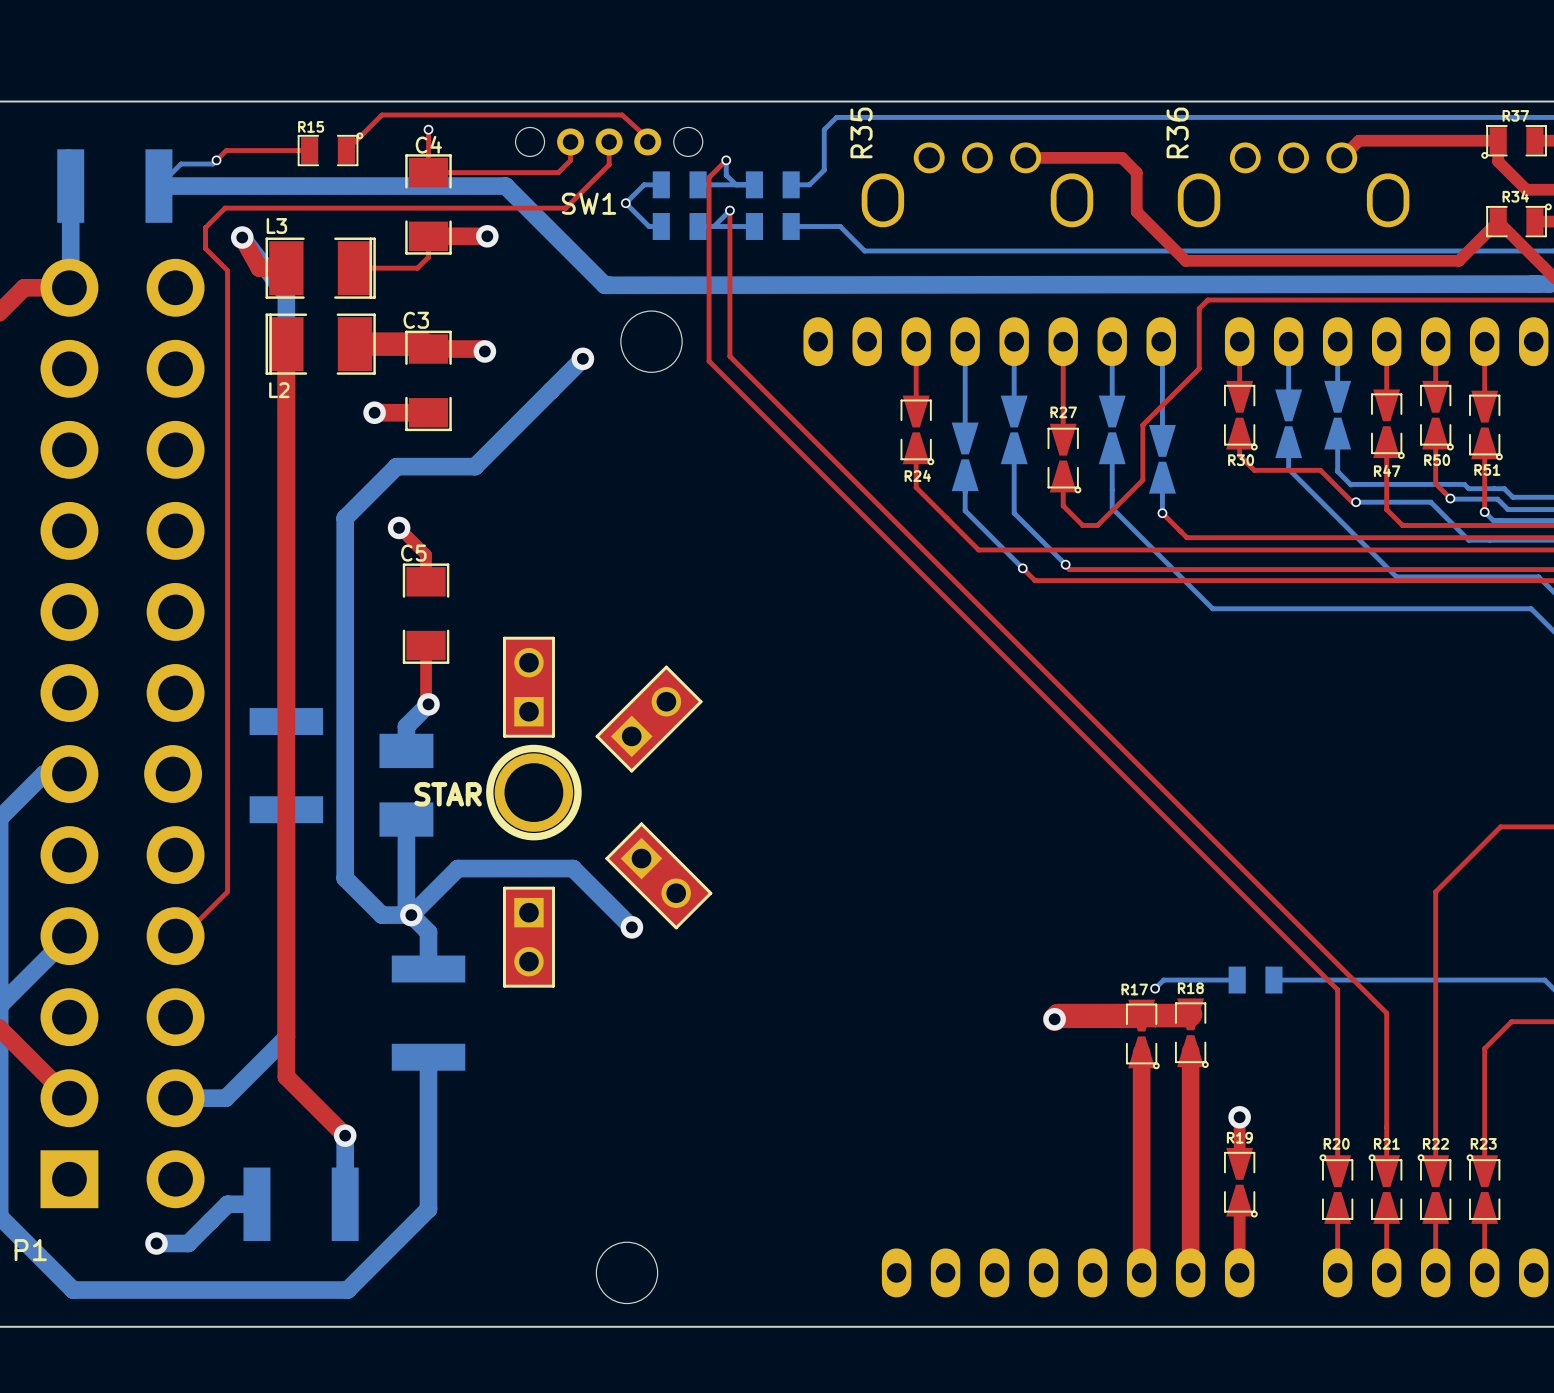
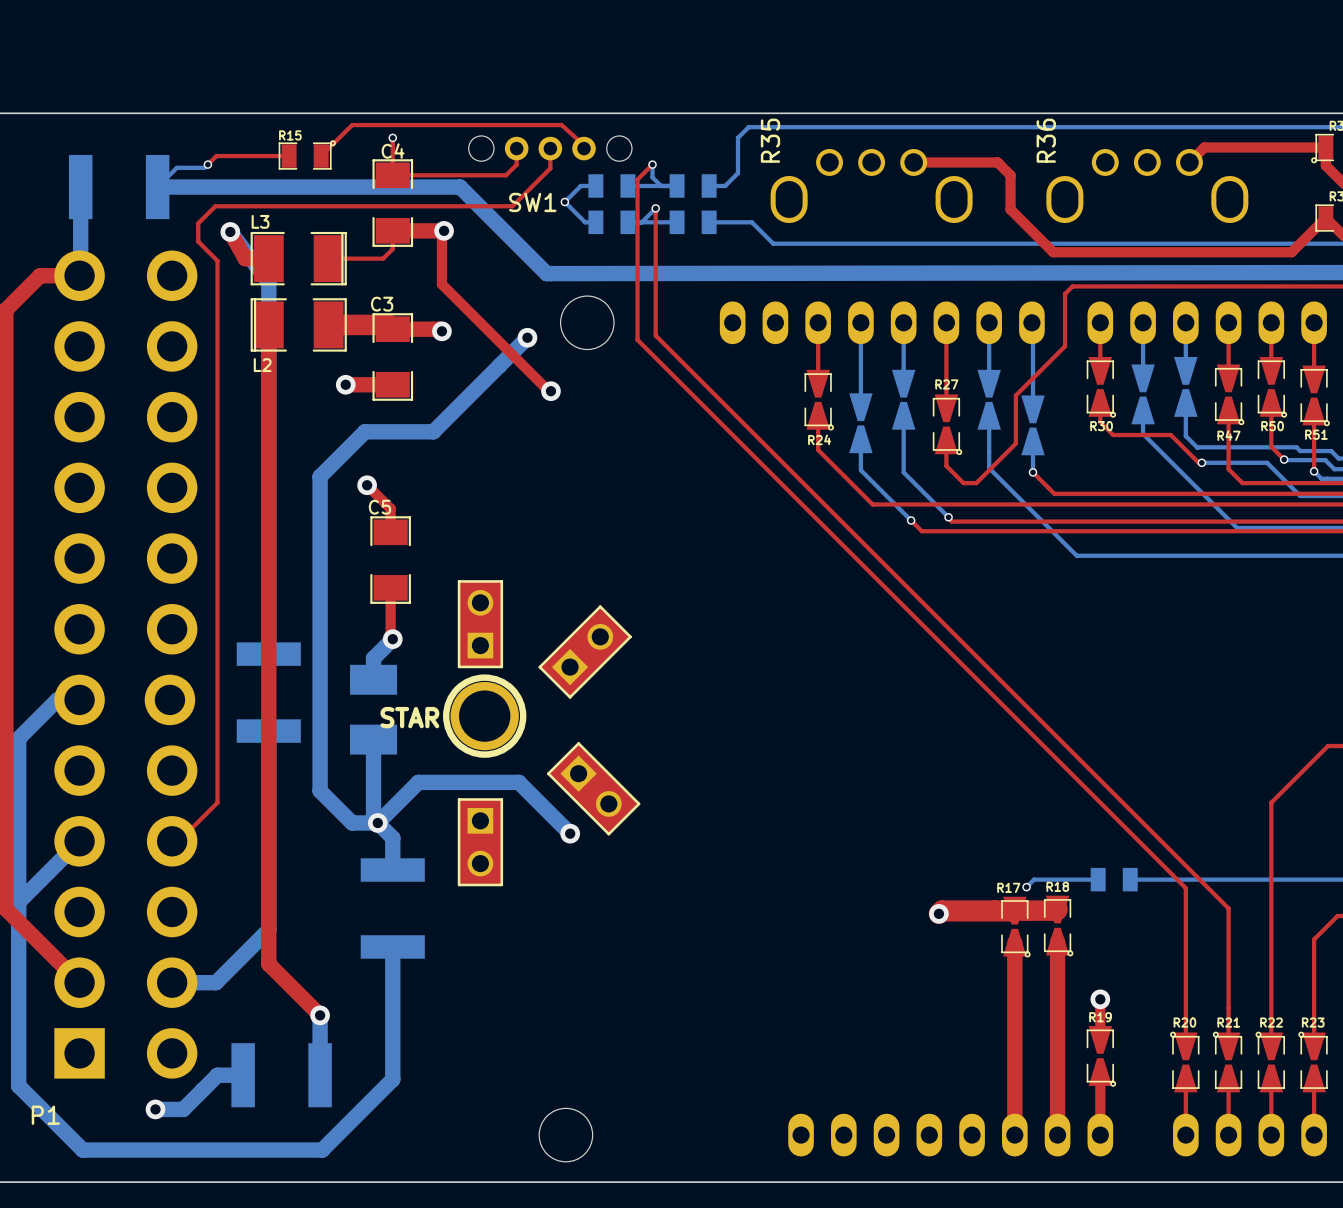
top track: none -> (441, 230) (441, 284) (550, 391)
via: none -> (550, 391)

